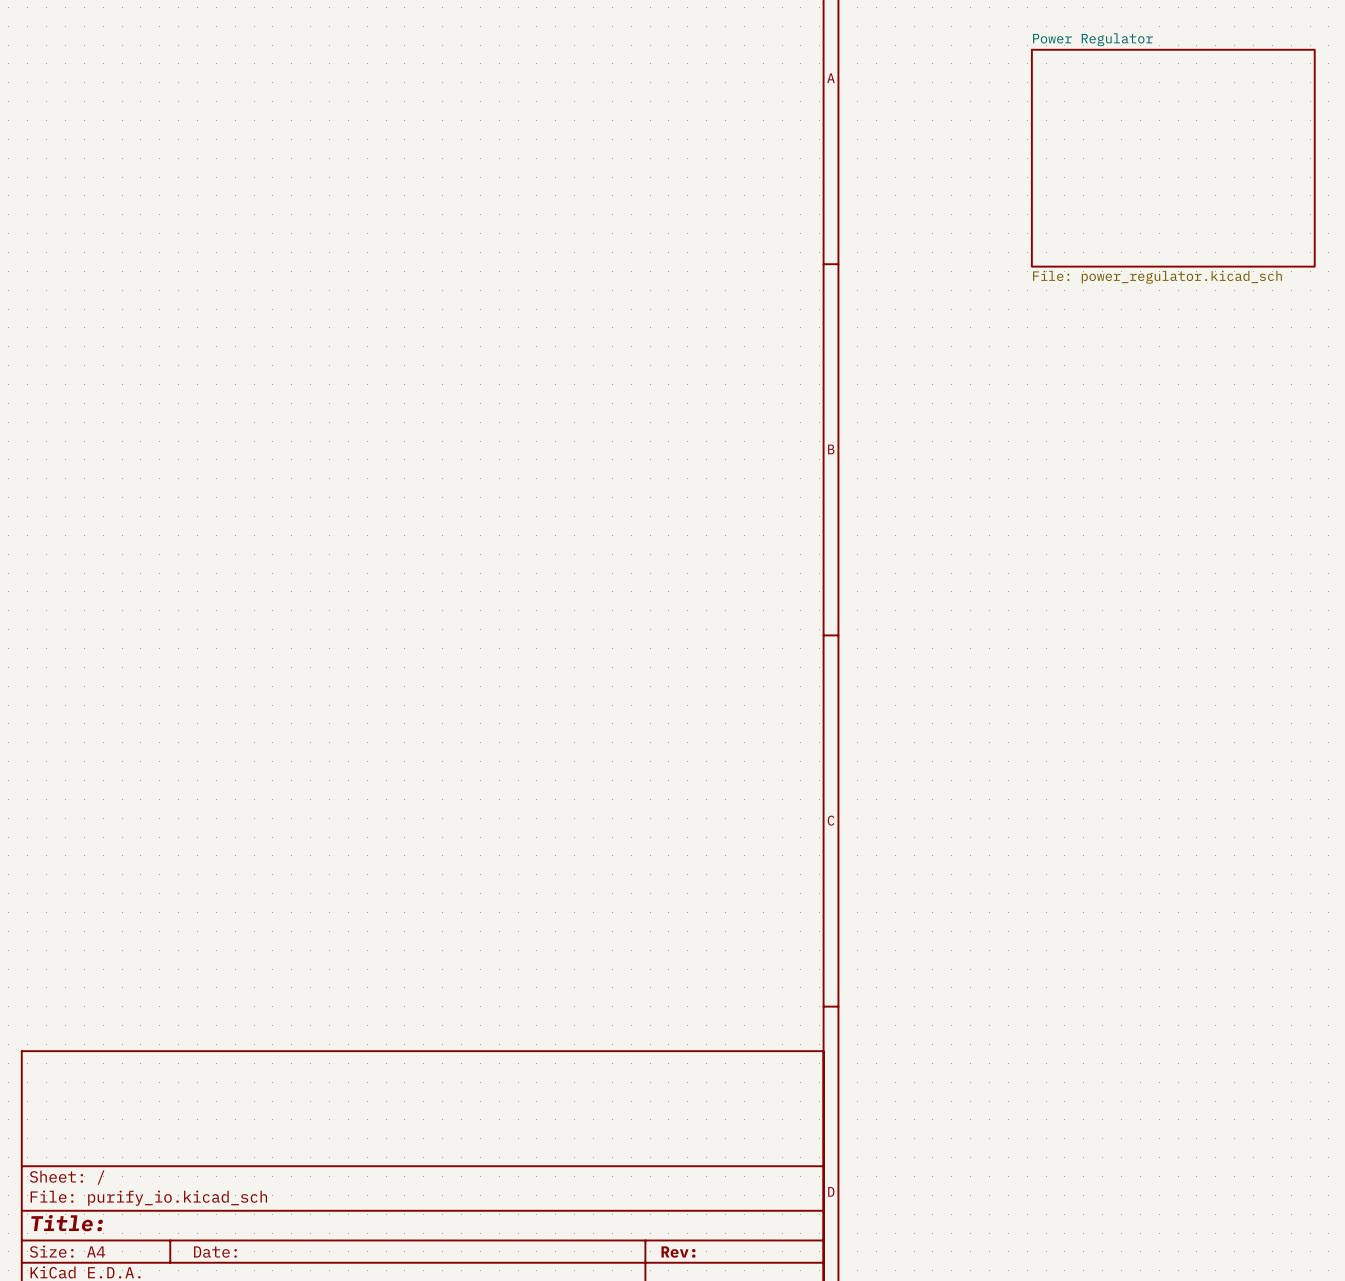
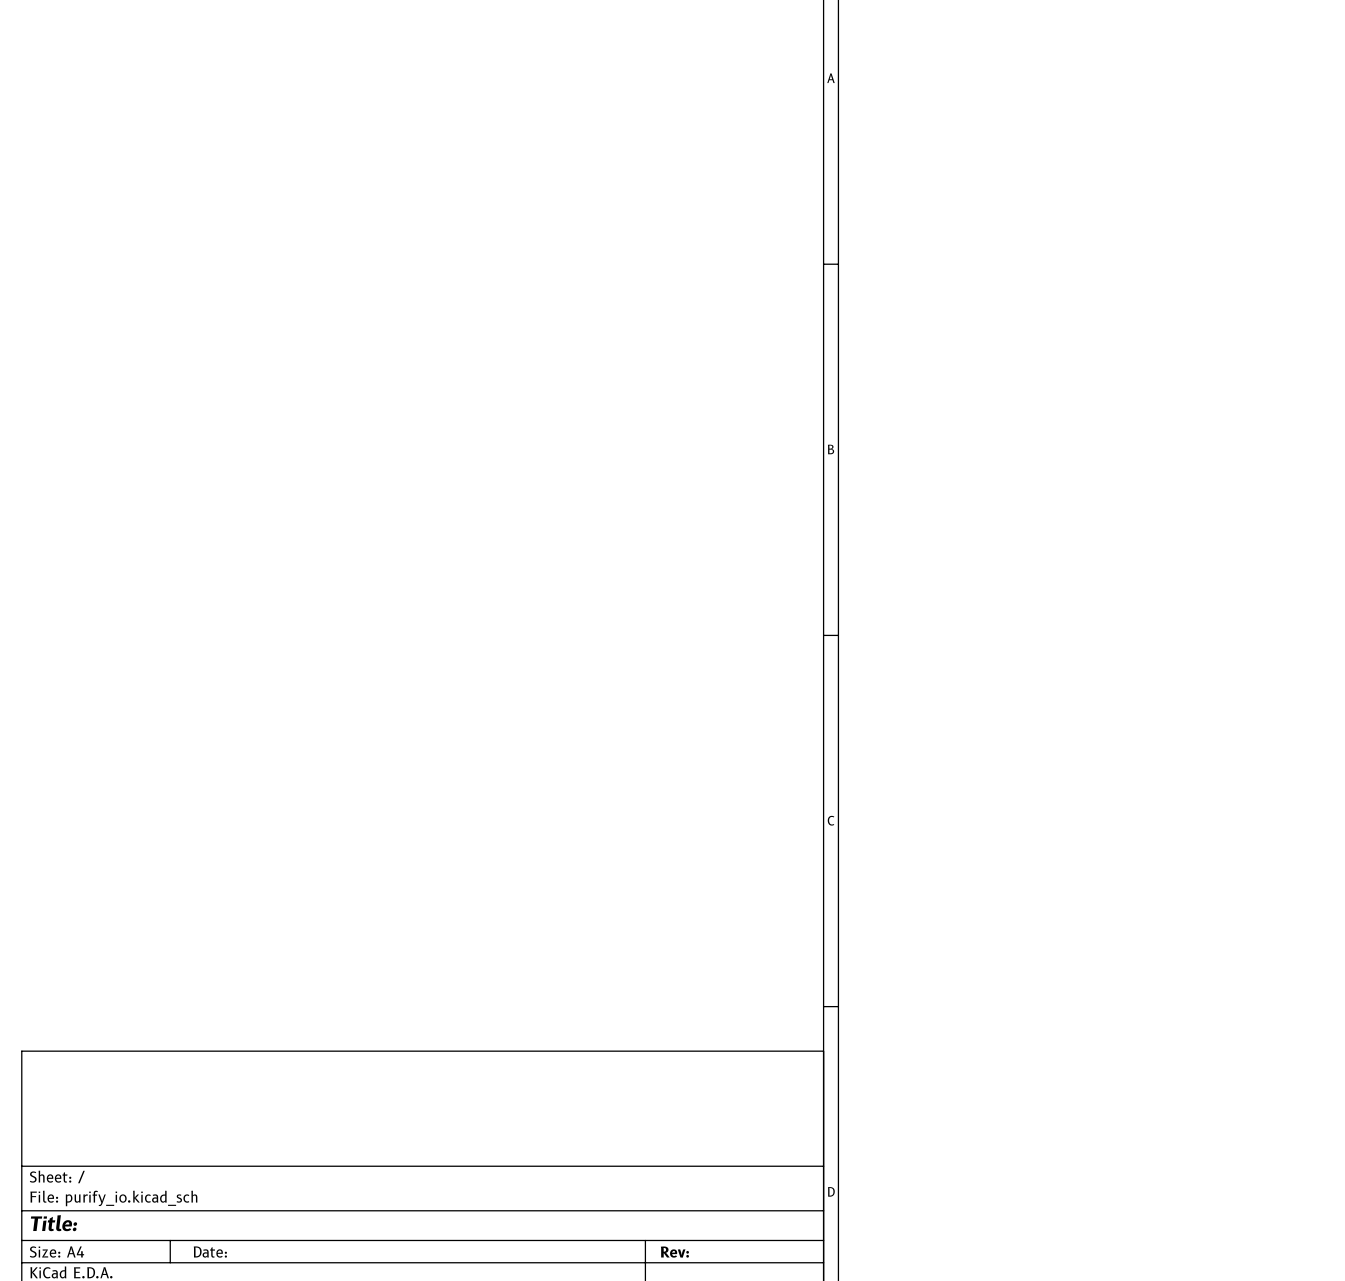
sheet Power Regulator: File: power_regulator.kicad_sch (1173, 158) -> none

